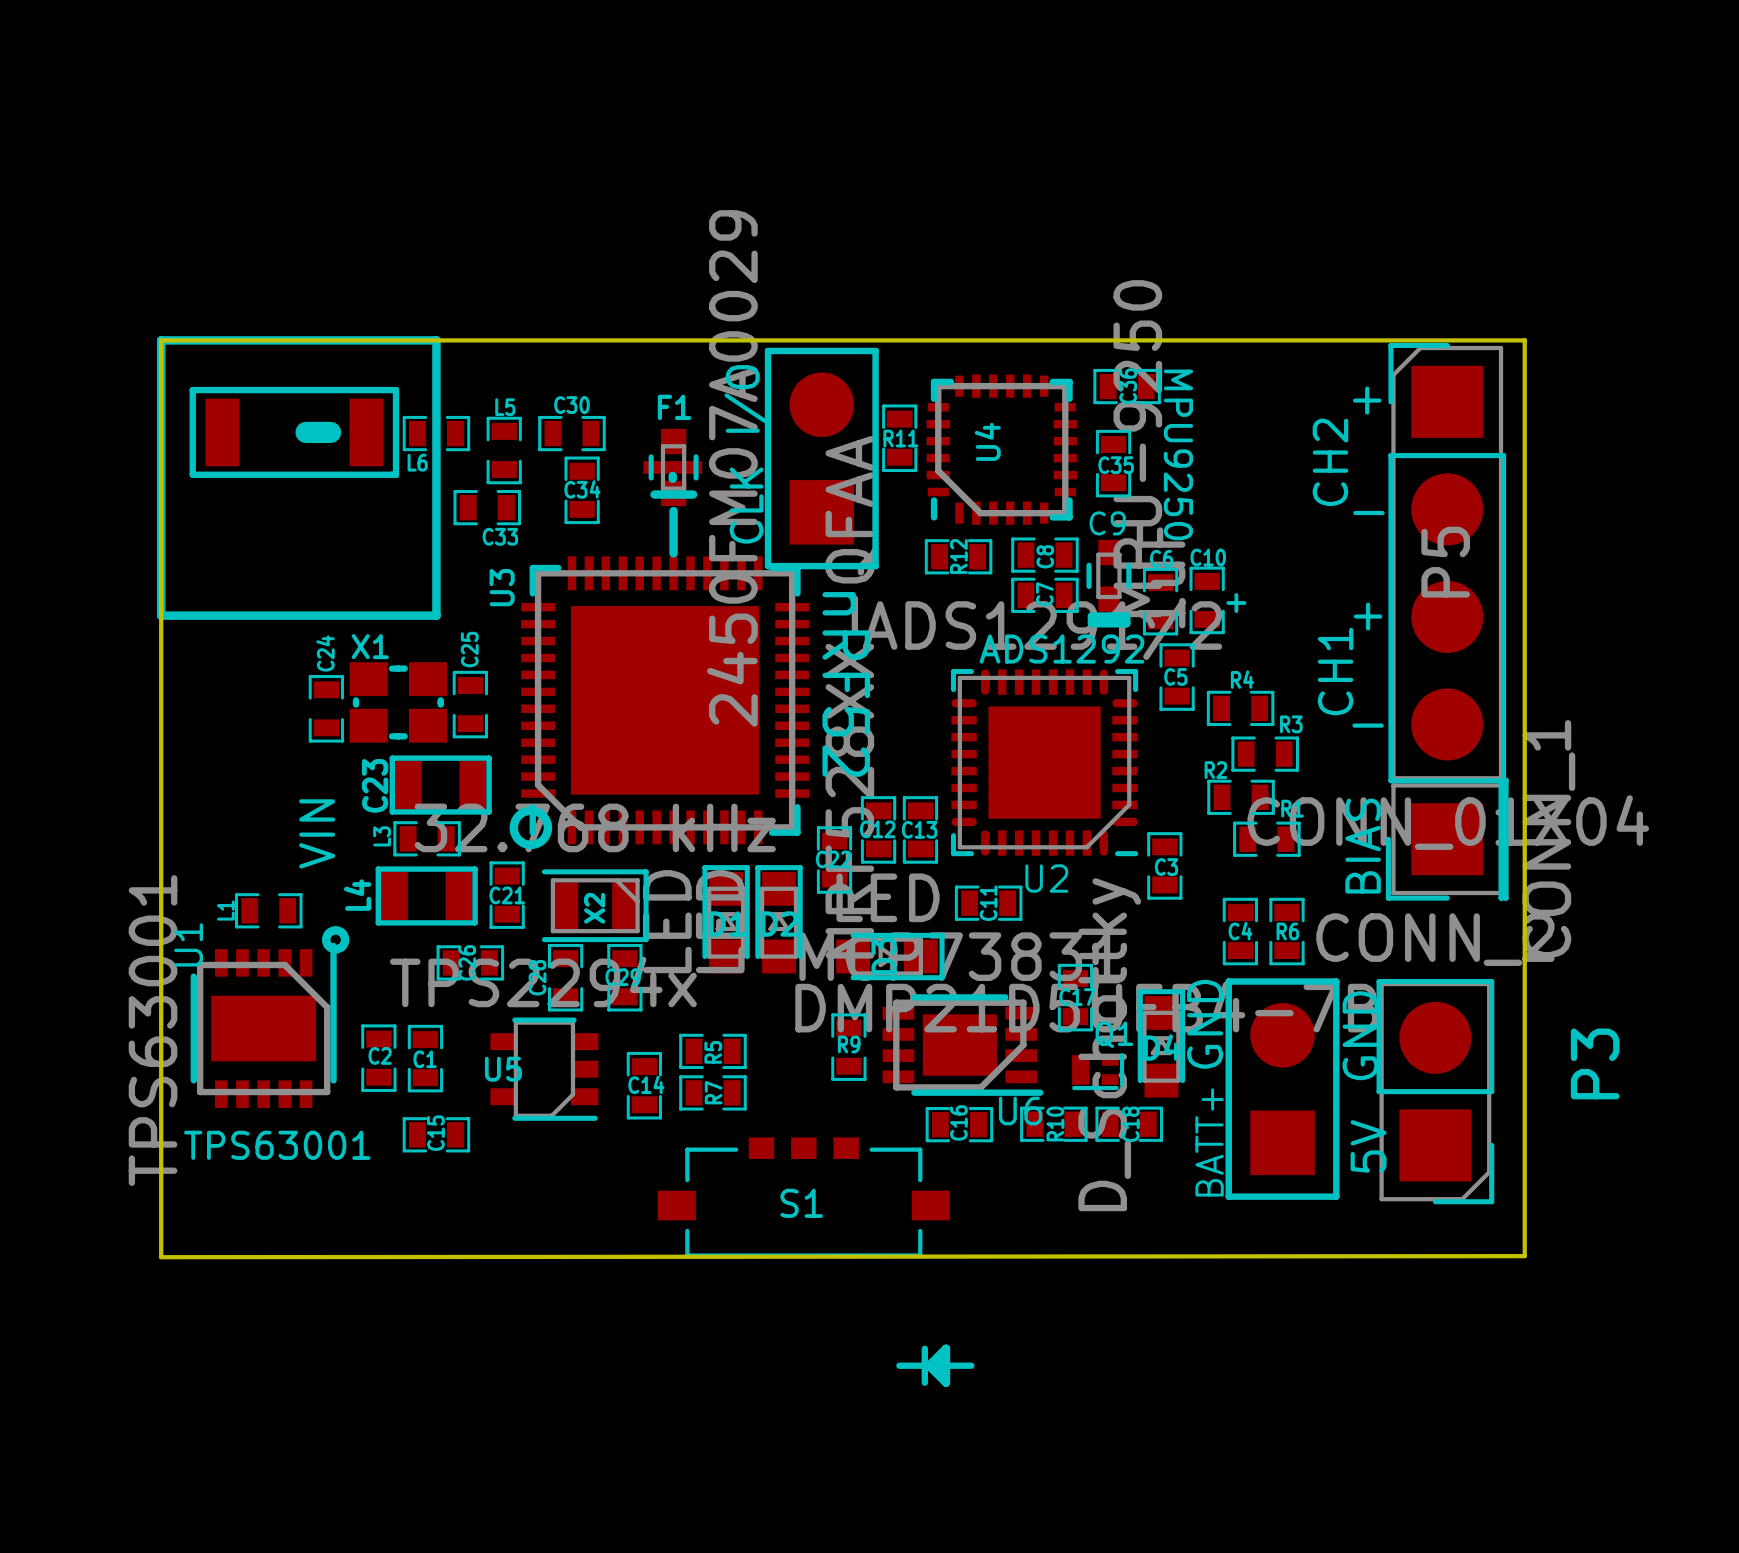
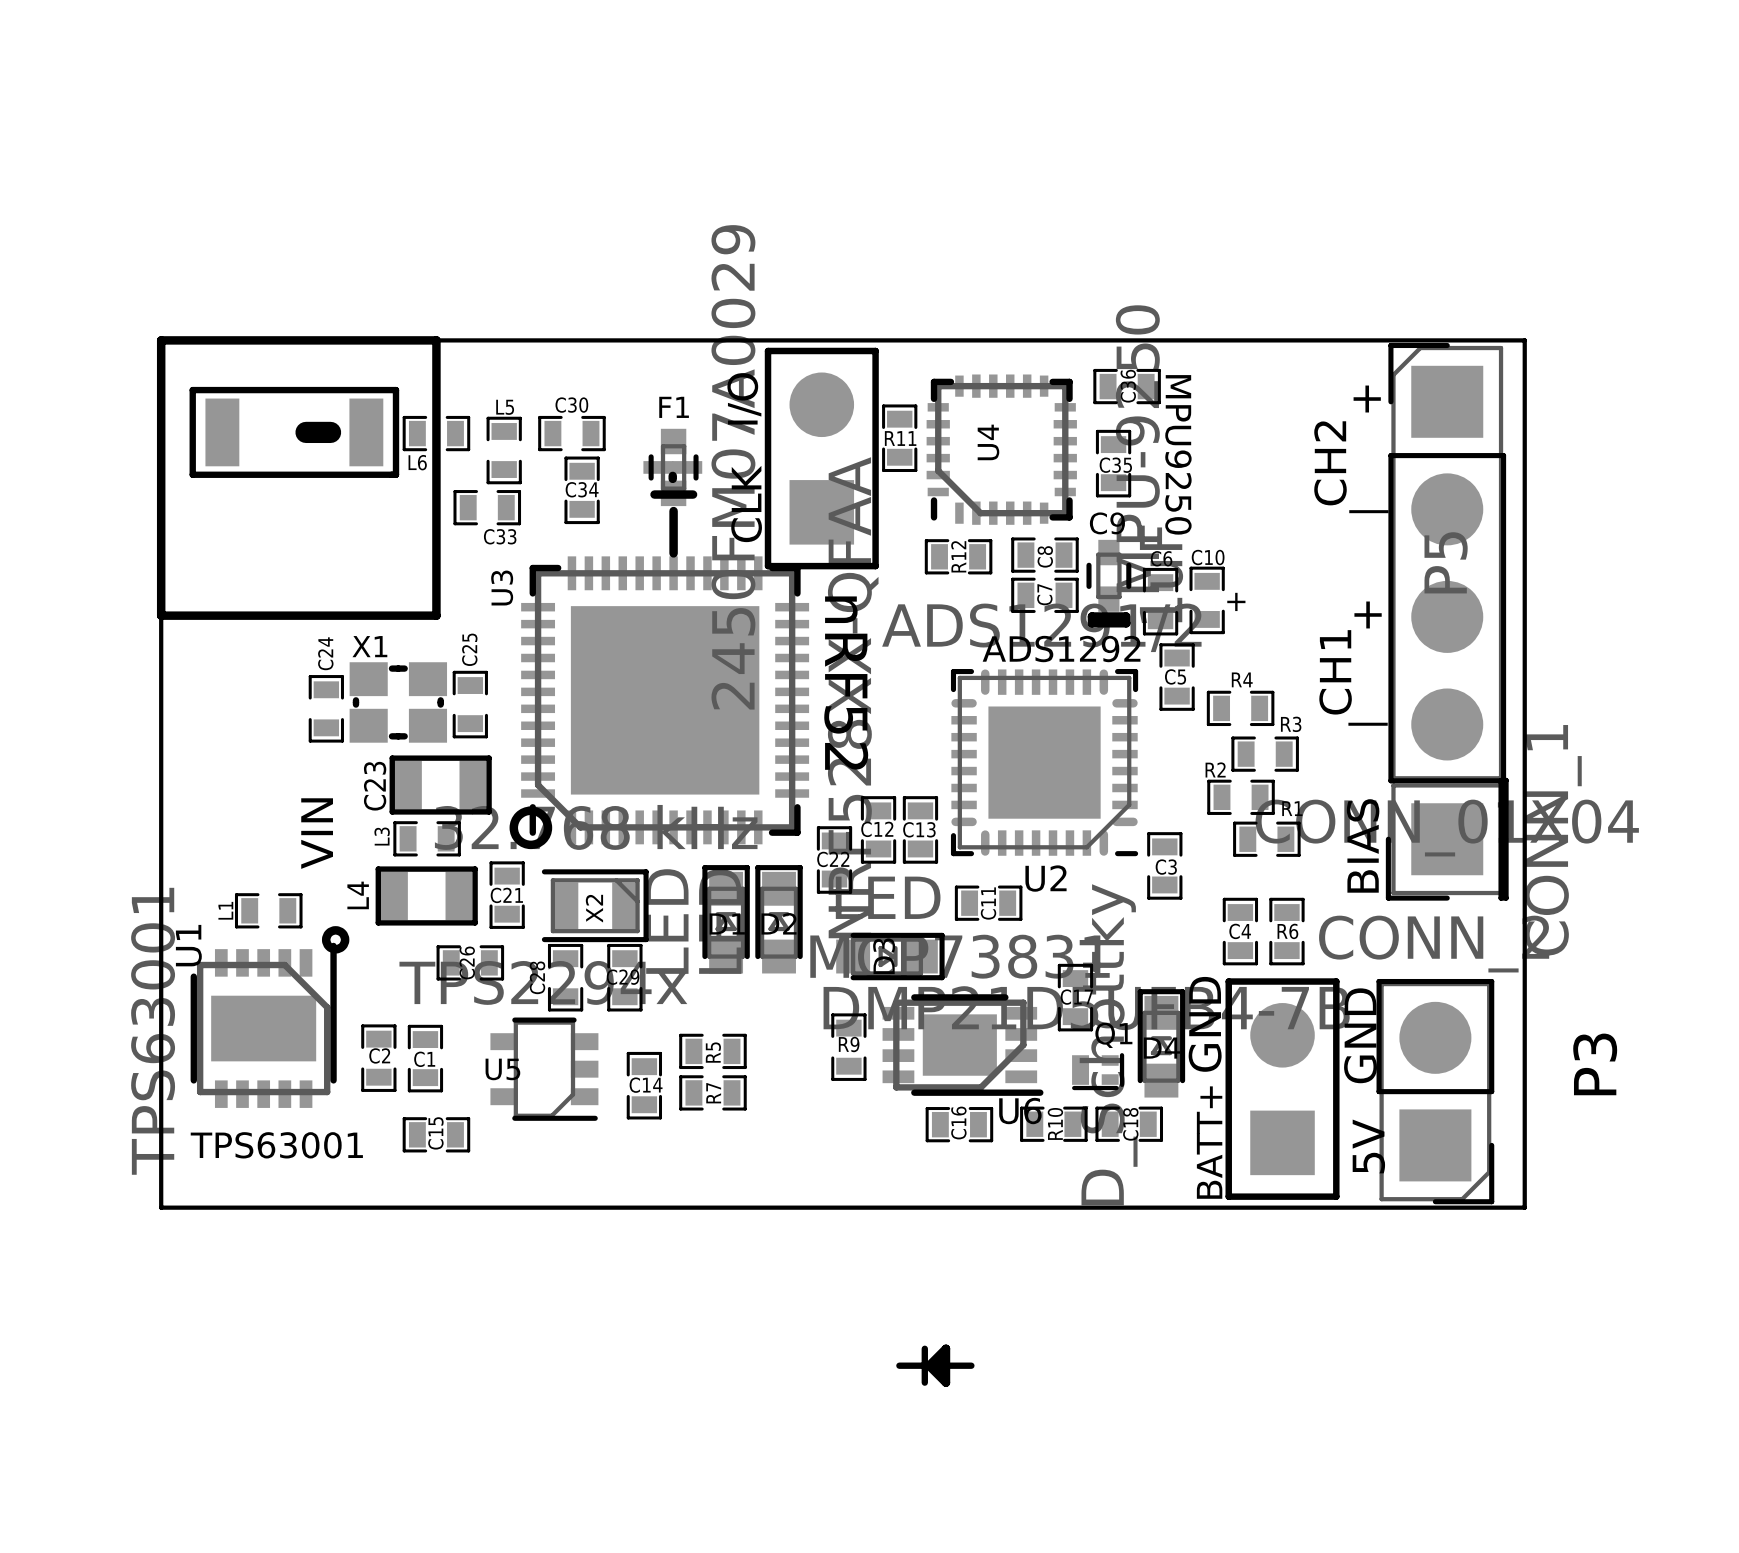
S1: (803, 1197) -> none
board edge: (161, 1207) (161, 1257) (1524, 1256) (1524, 1207) -> (161, 1207) (1524, 1207)

